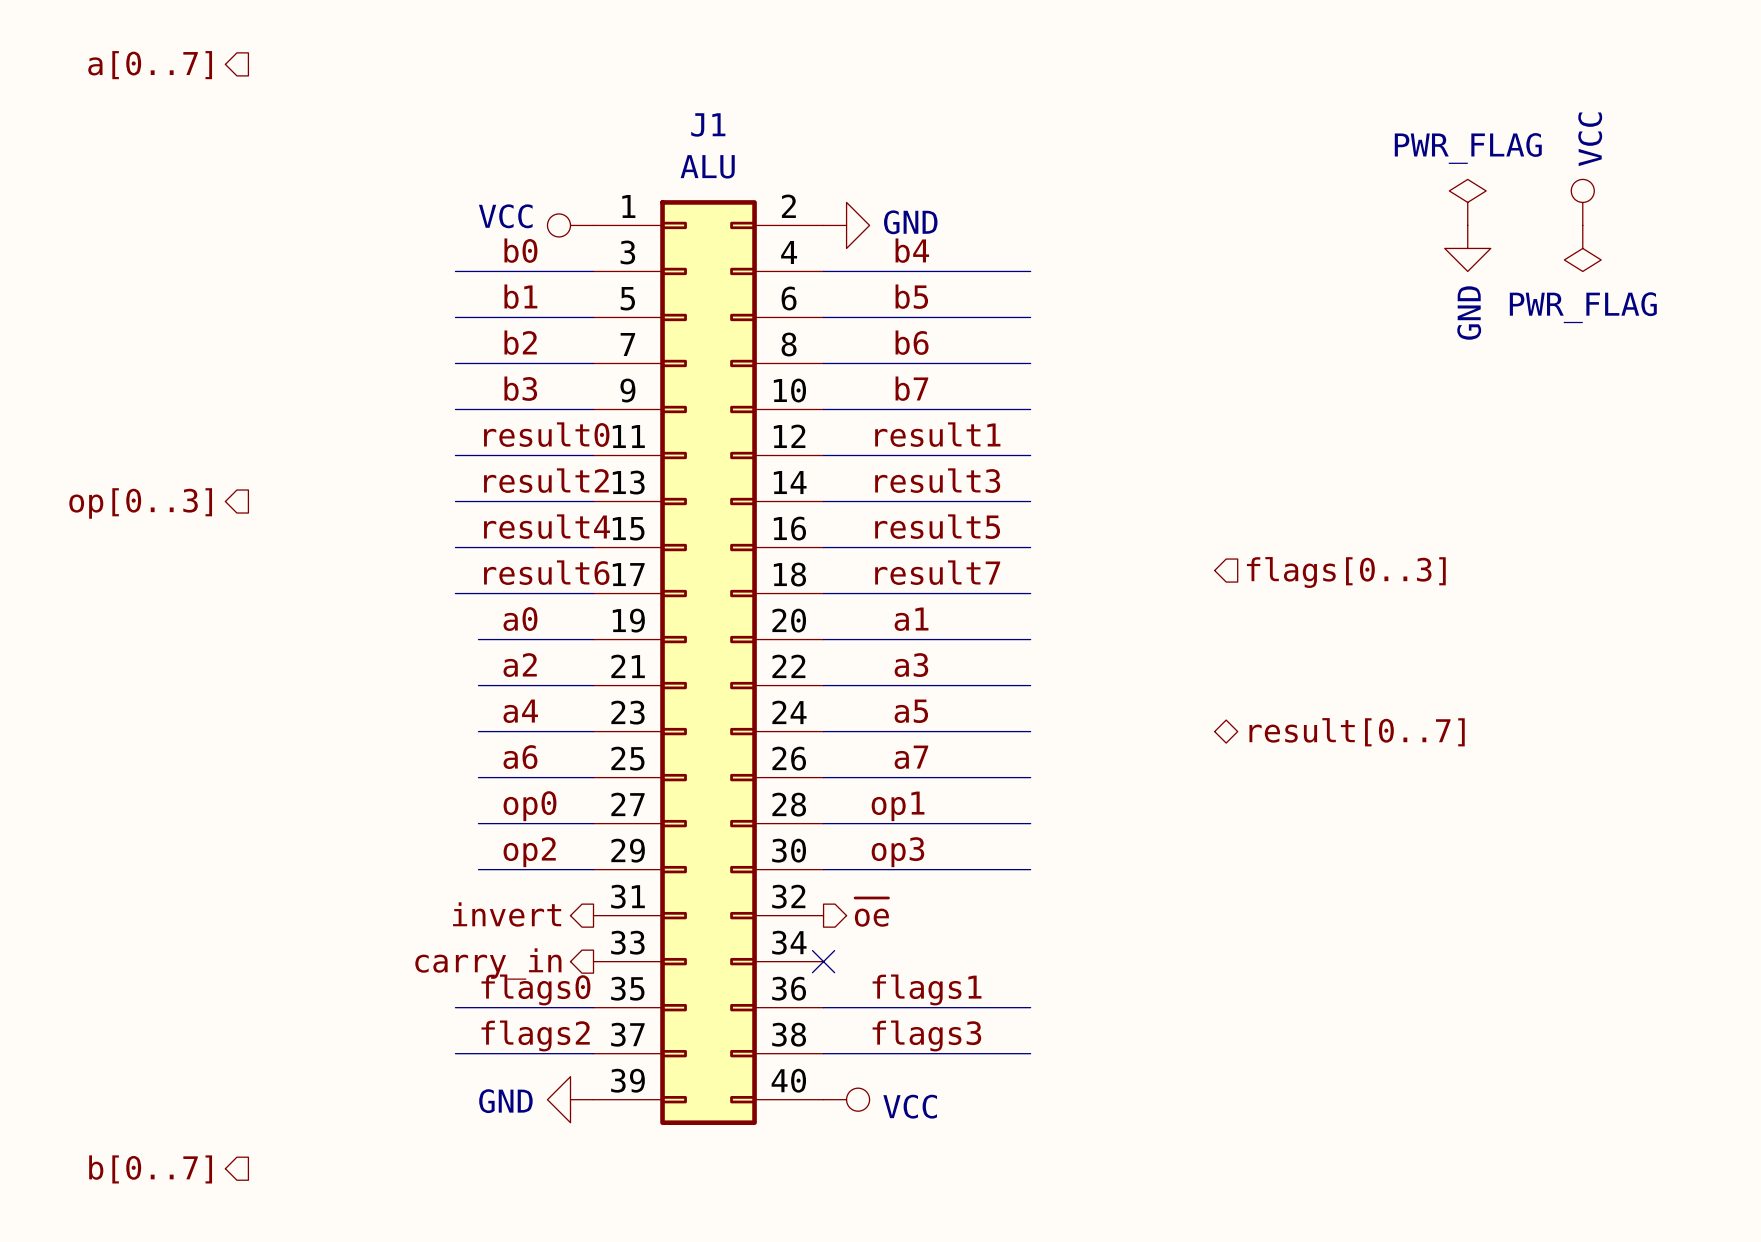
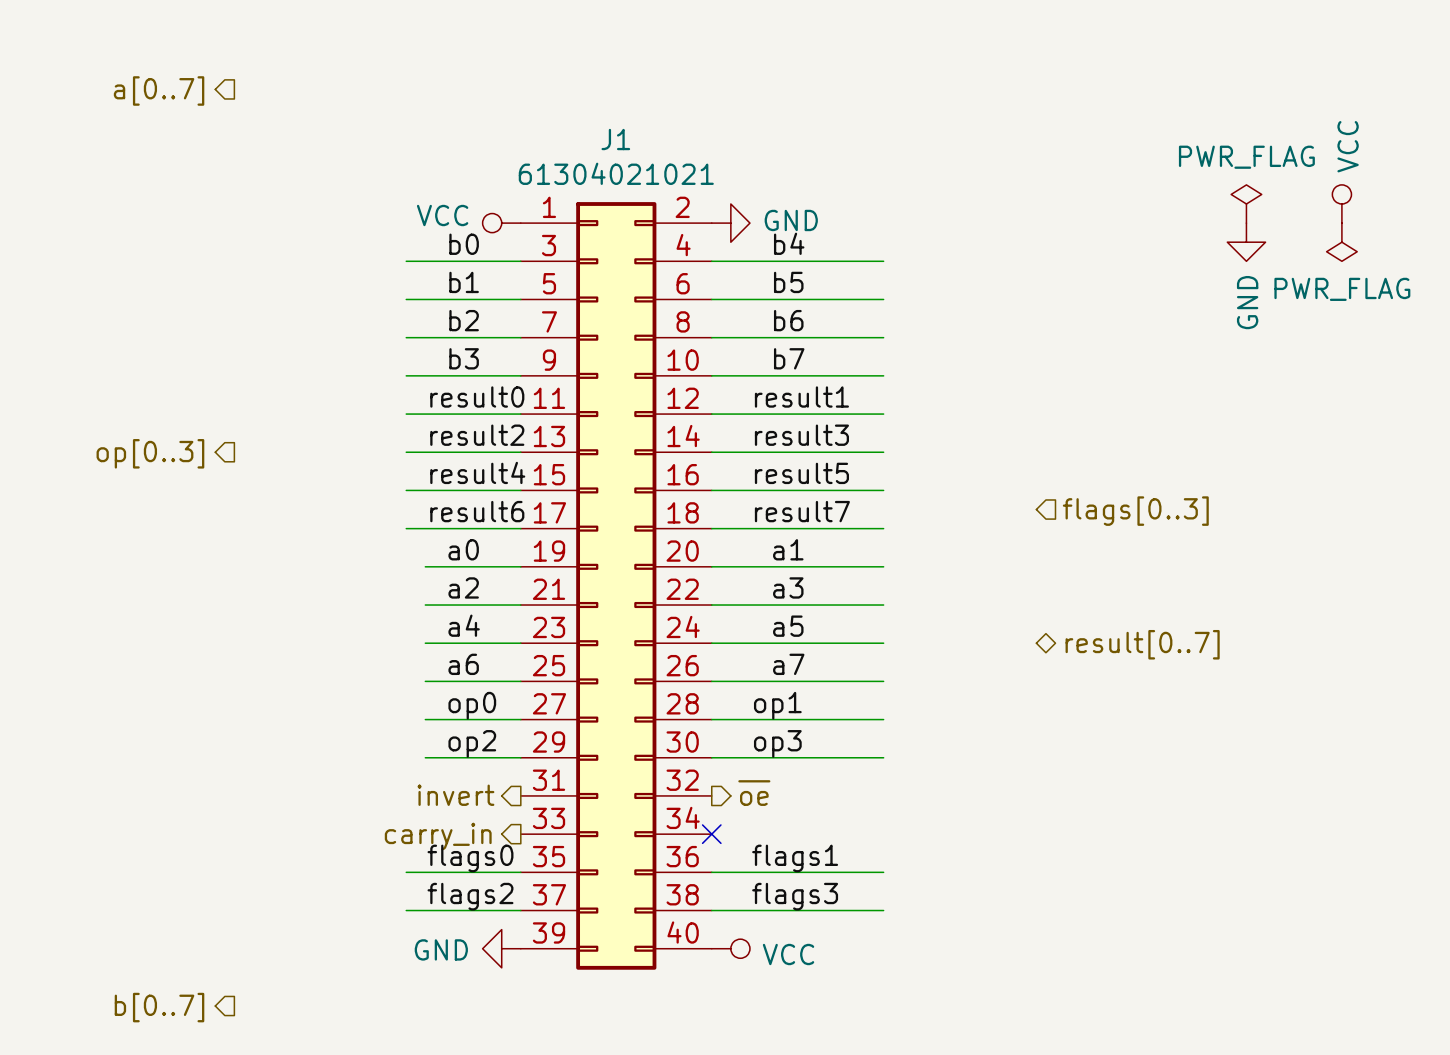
J1 value: ALU (707, 166) -> 61304021021 (616, 173)

